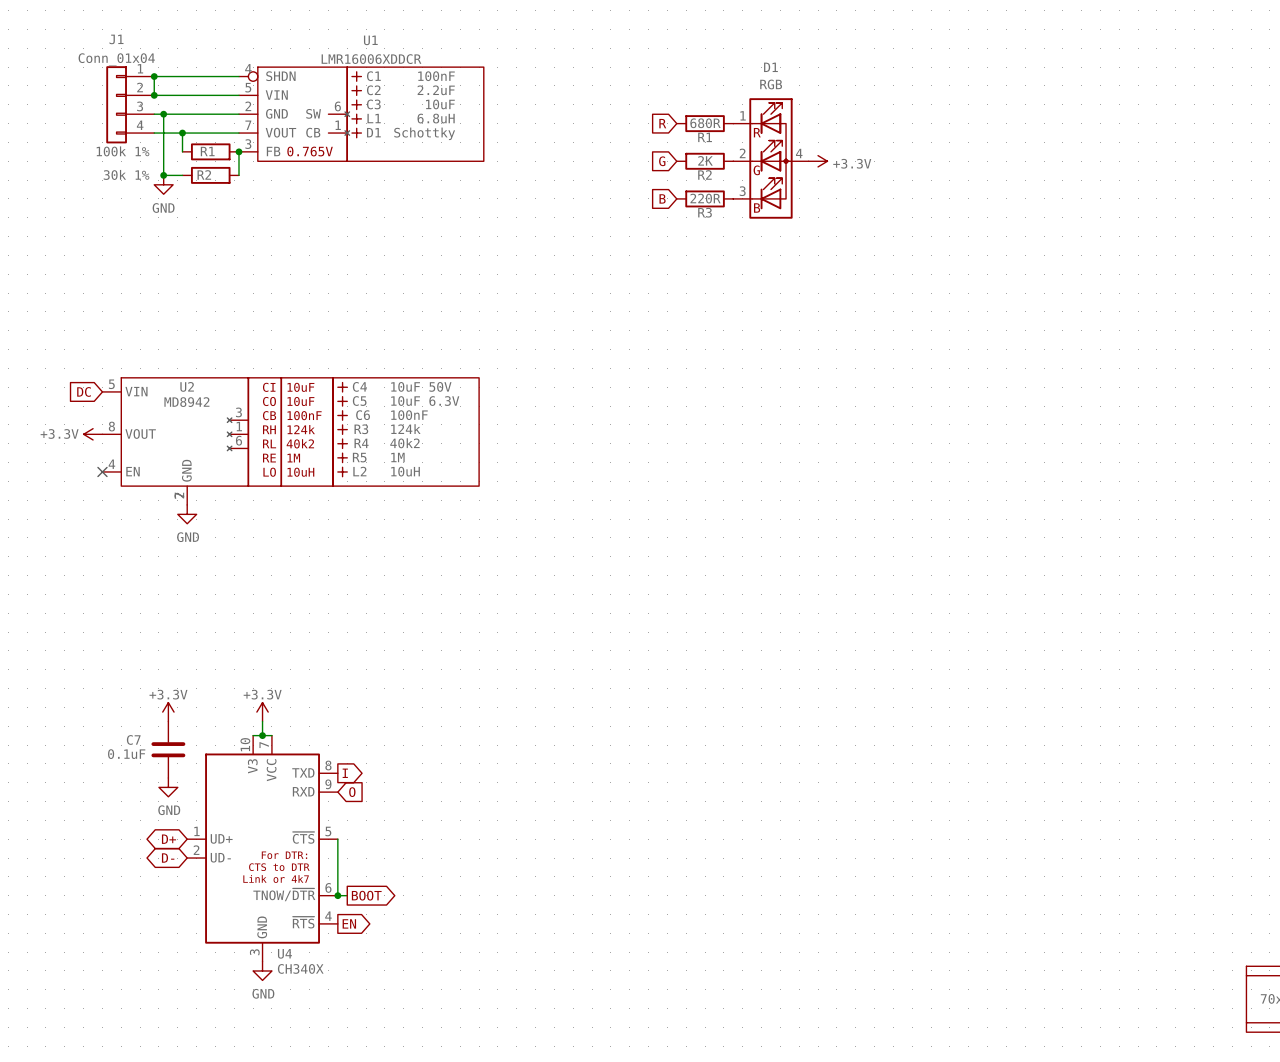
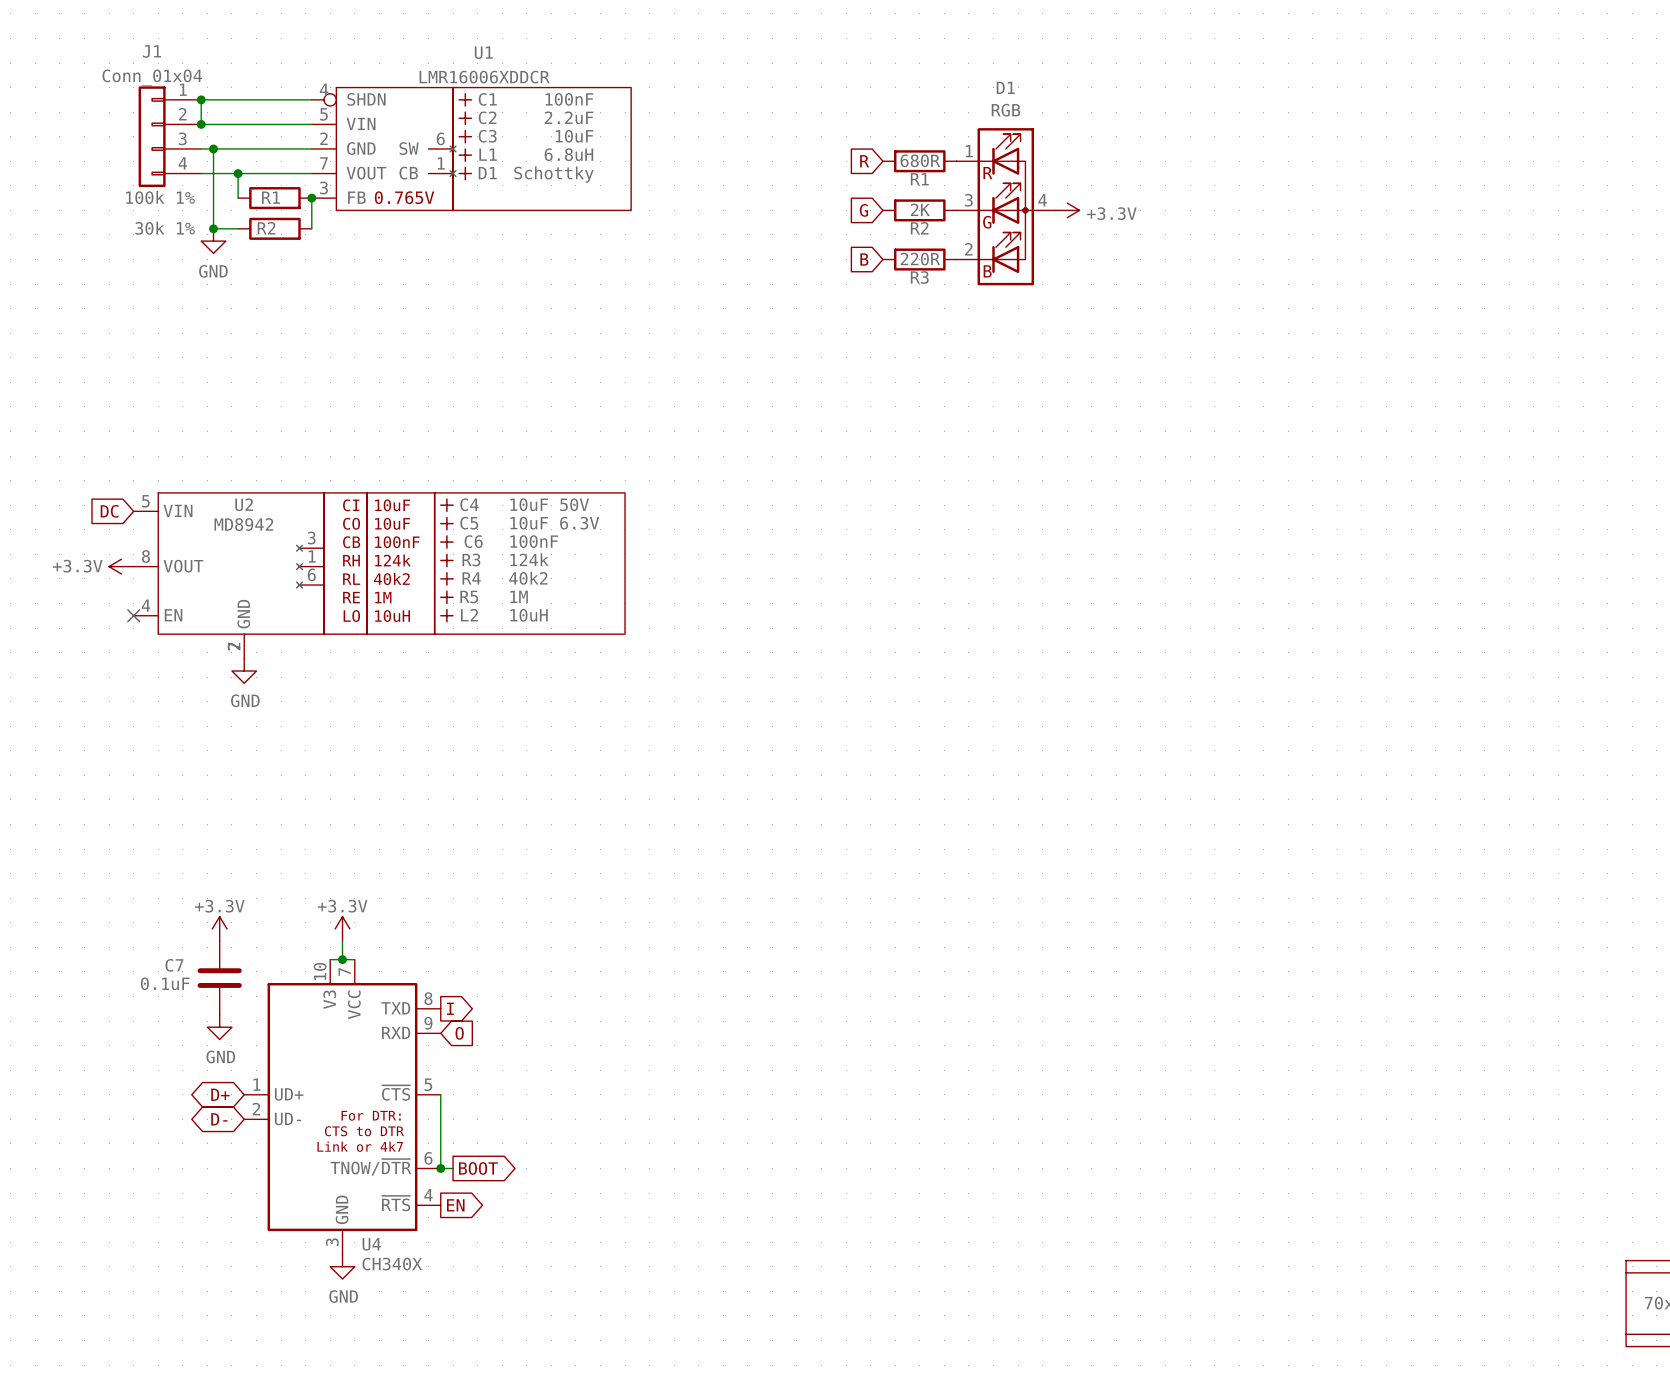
D1 pin number: 2 (742, 153) -> 3 (968, 200)
D1 pin number: 3 (742, 191) -> 2 (968, 249)

